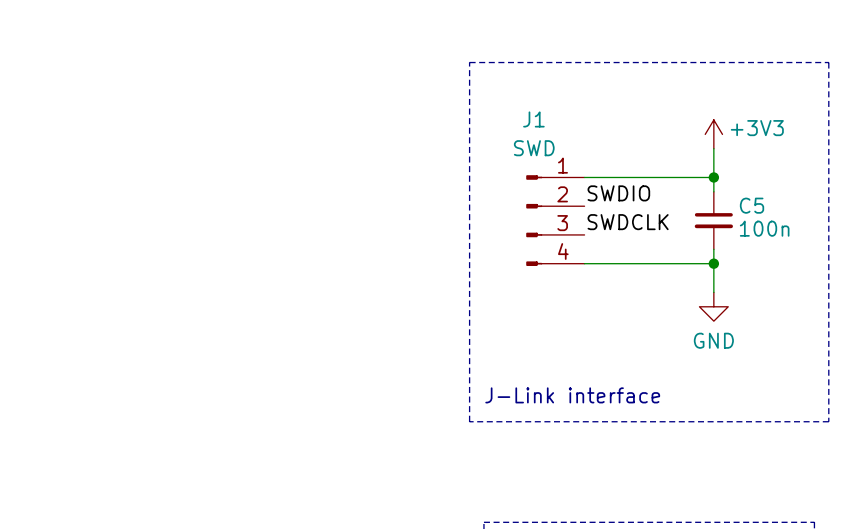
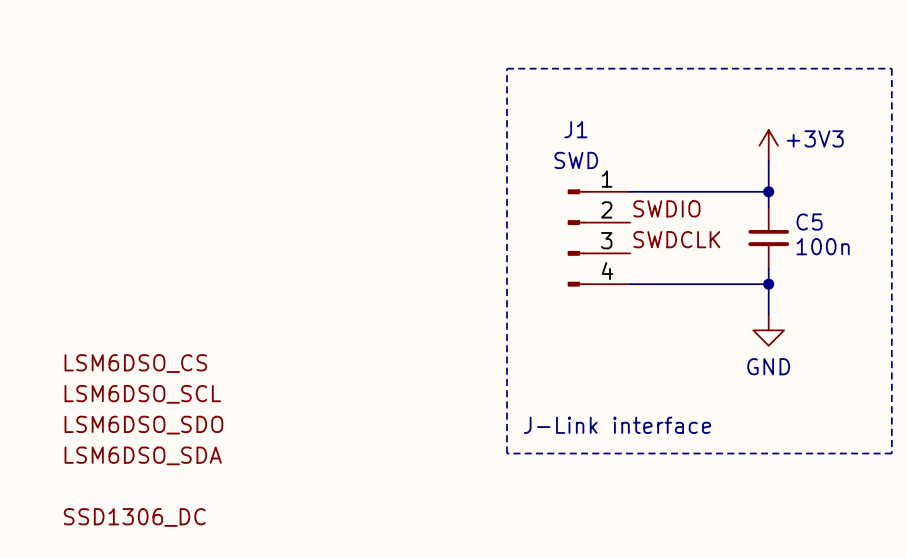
label: none -> LSM6DSO_CS (135, 363)
label: none -> LSM6DSO_SCL (142, 394)
label: none -> LSM6DSO_SDO (143, 425)
label: none -> LSM6DSO_SDA (143, 455)
label: none -> SSD1306_DC (134, 517)

